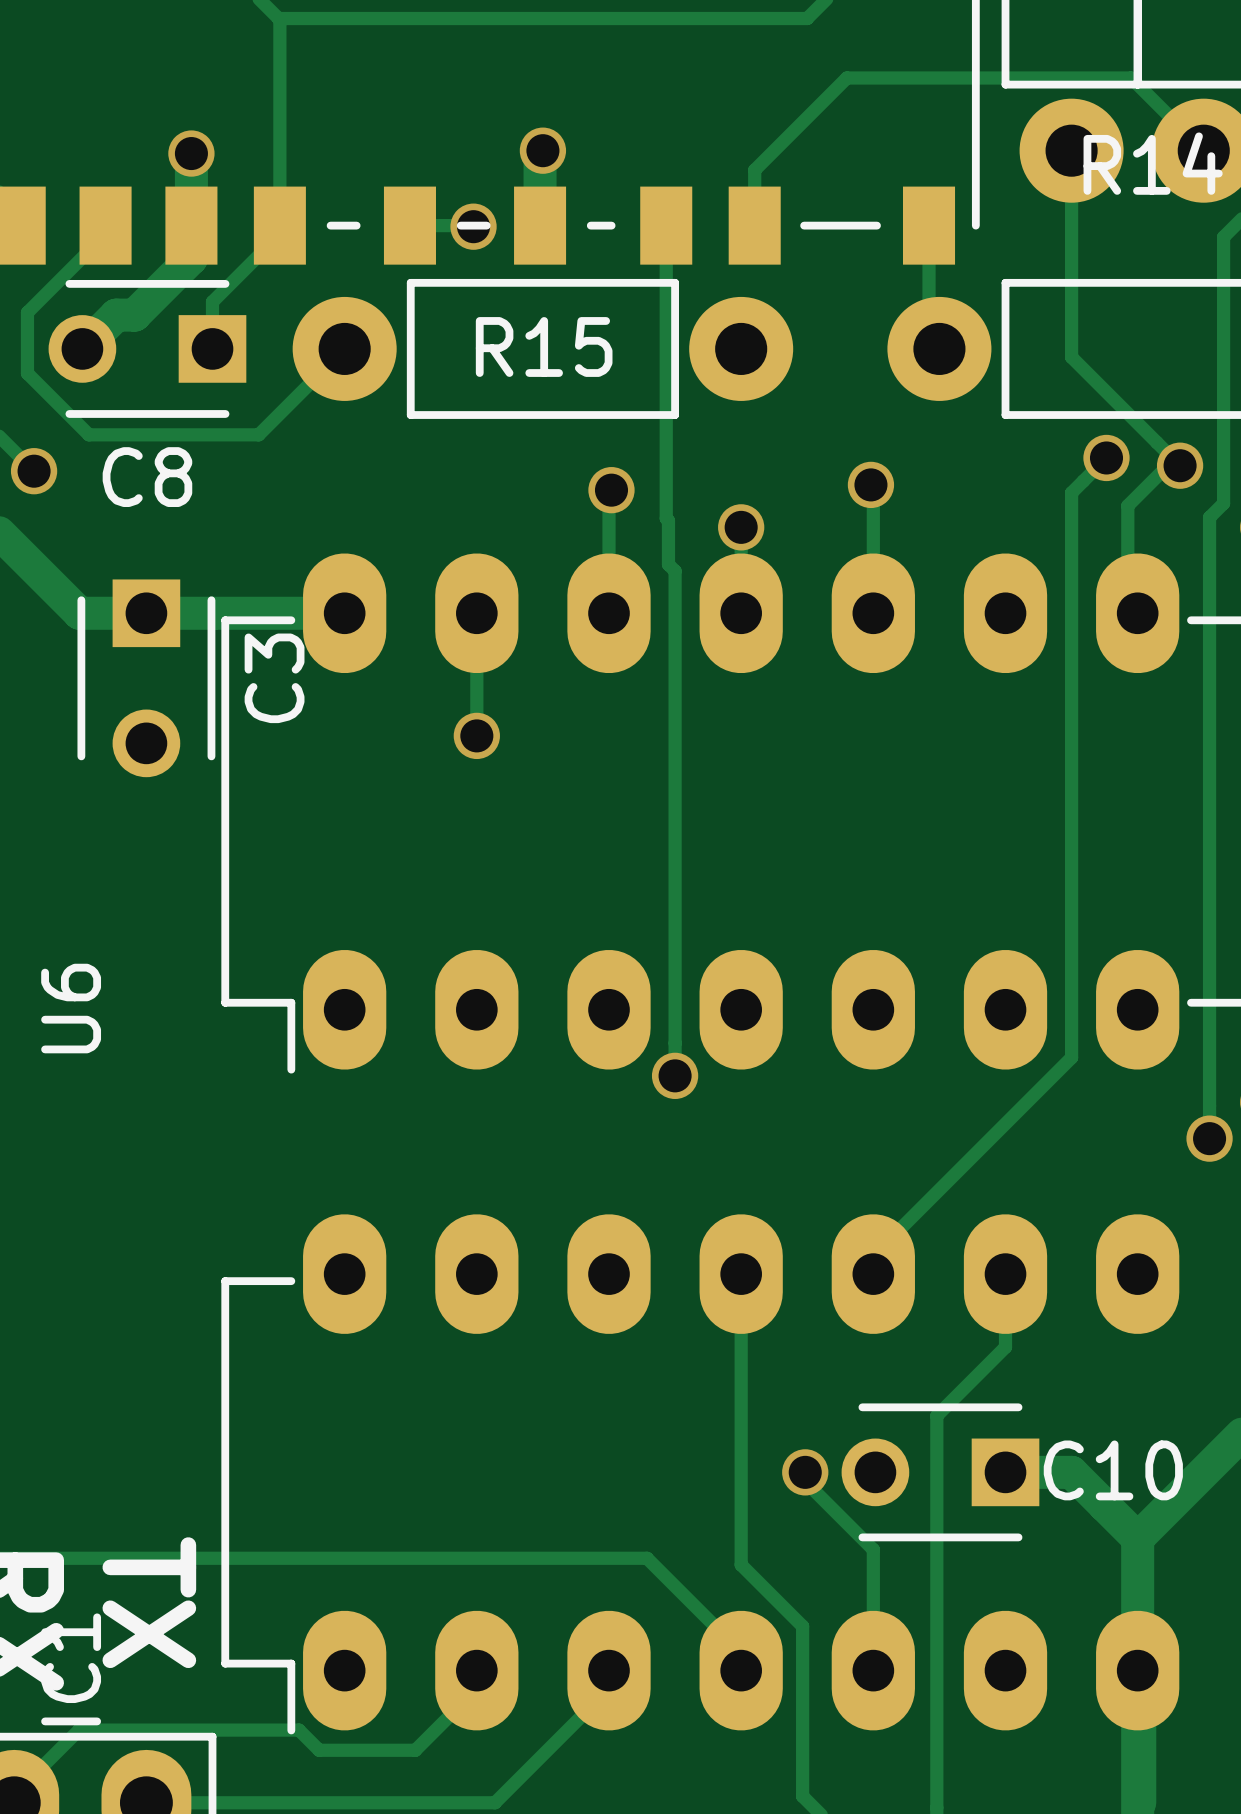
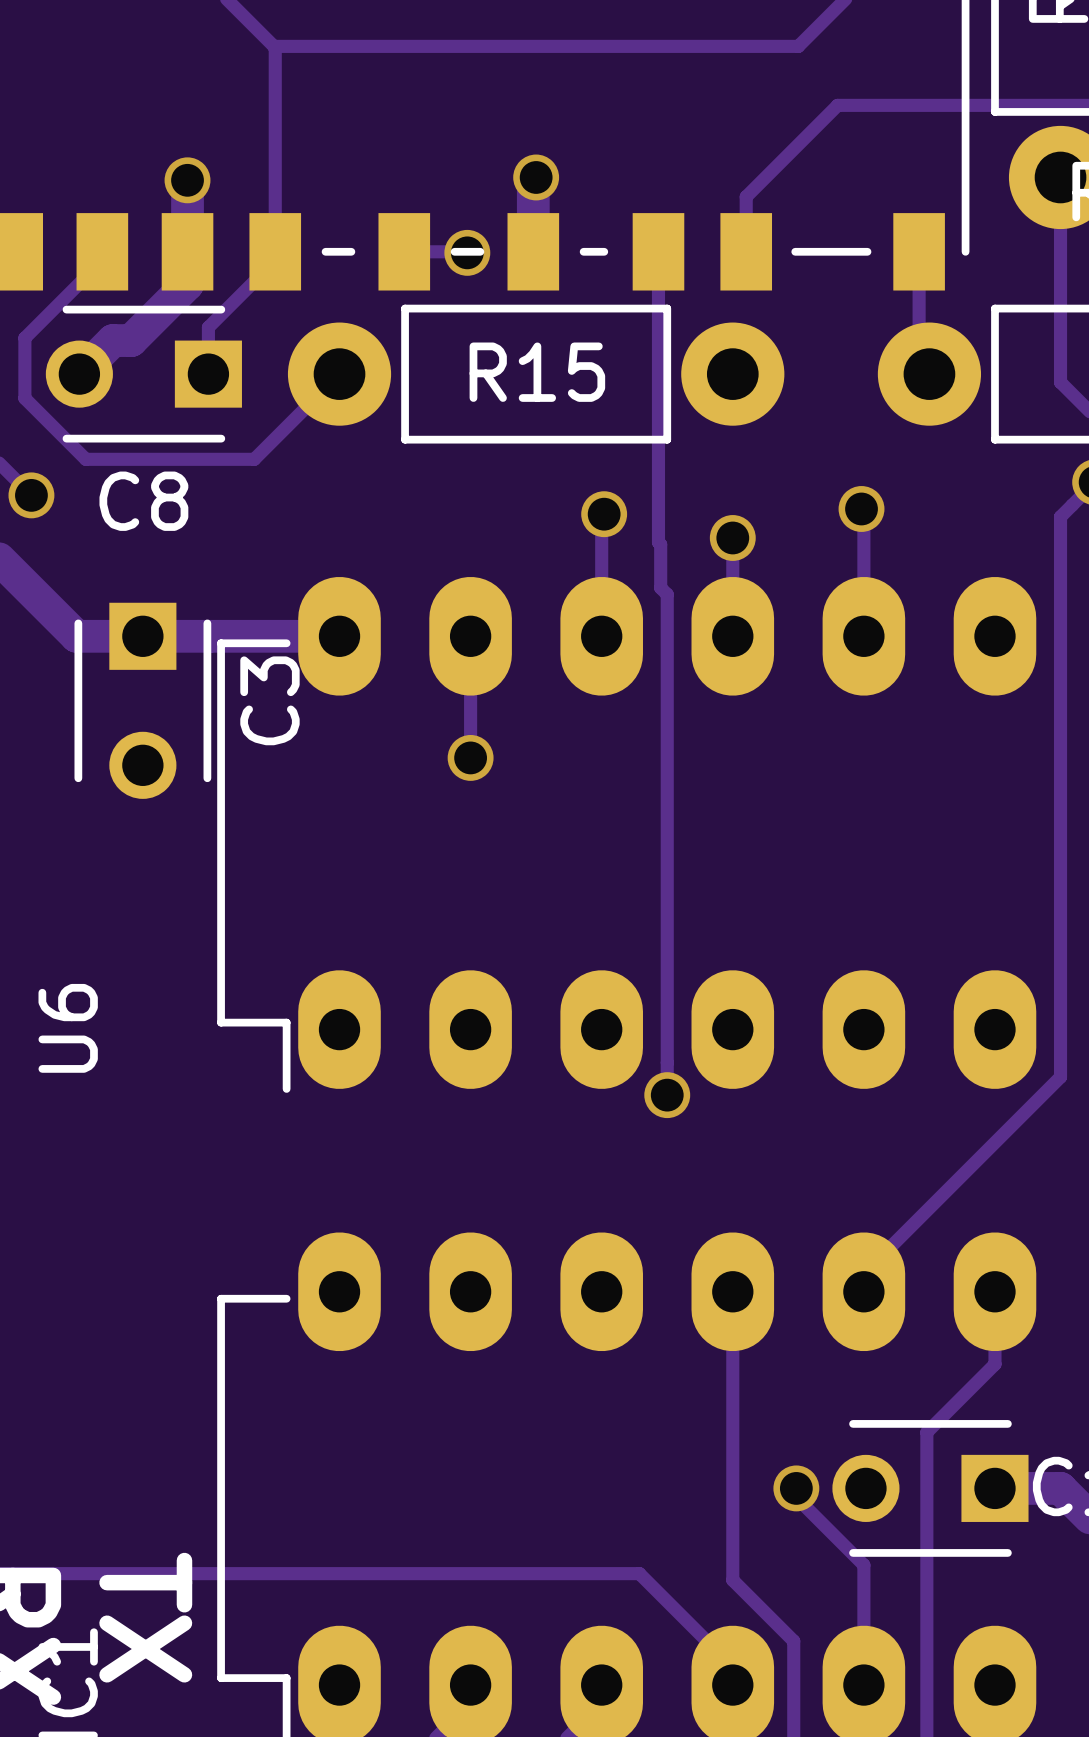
via position: (741, 527) -> (732, 537)

